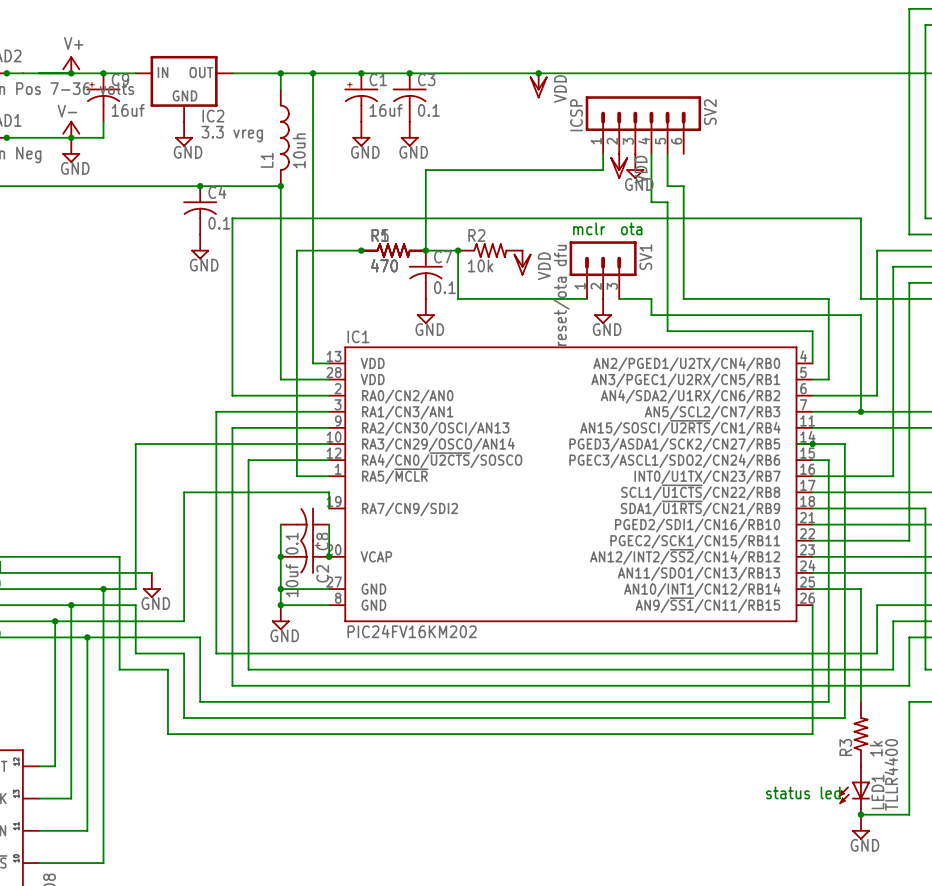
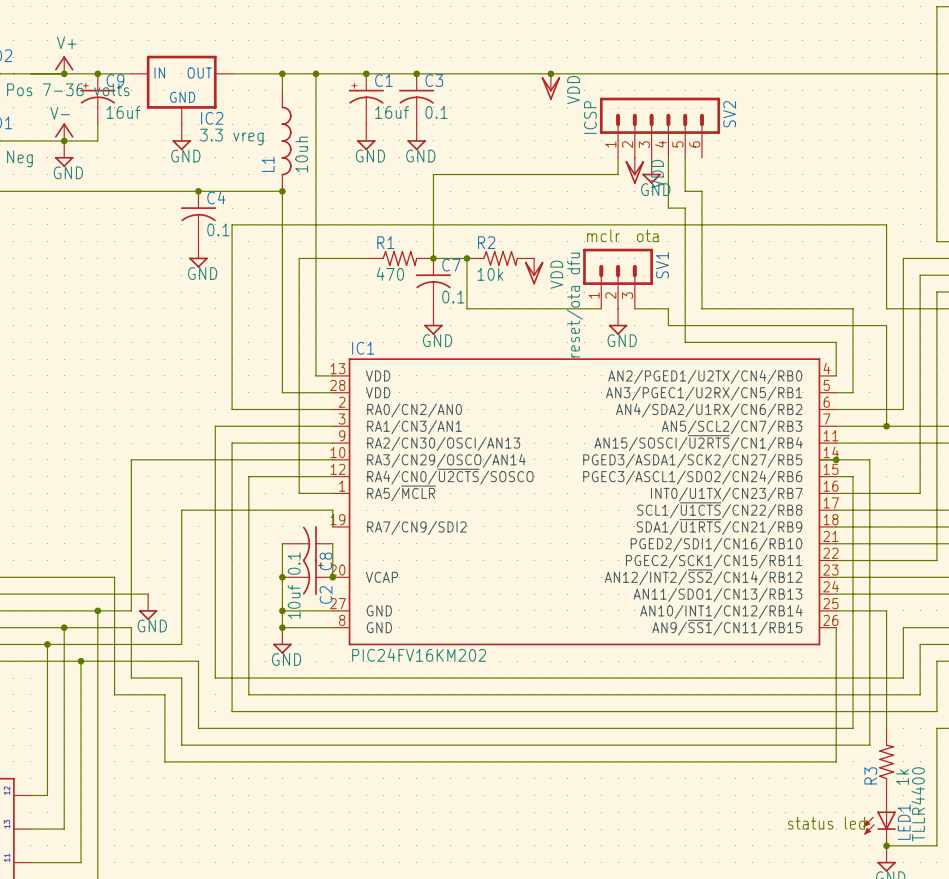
junction: (361, 250) -> none
part: 470 (393, 250) -> none

